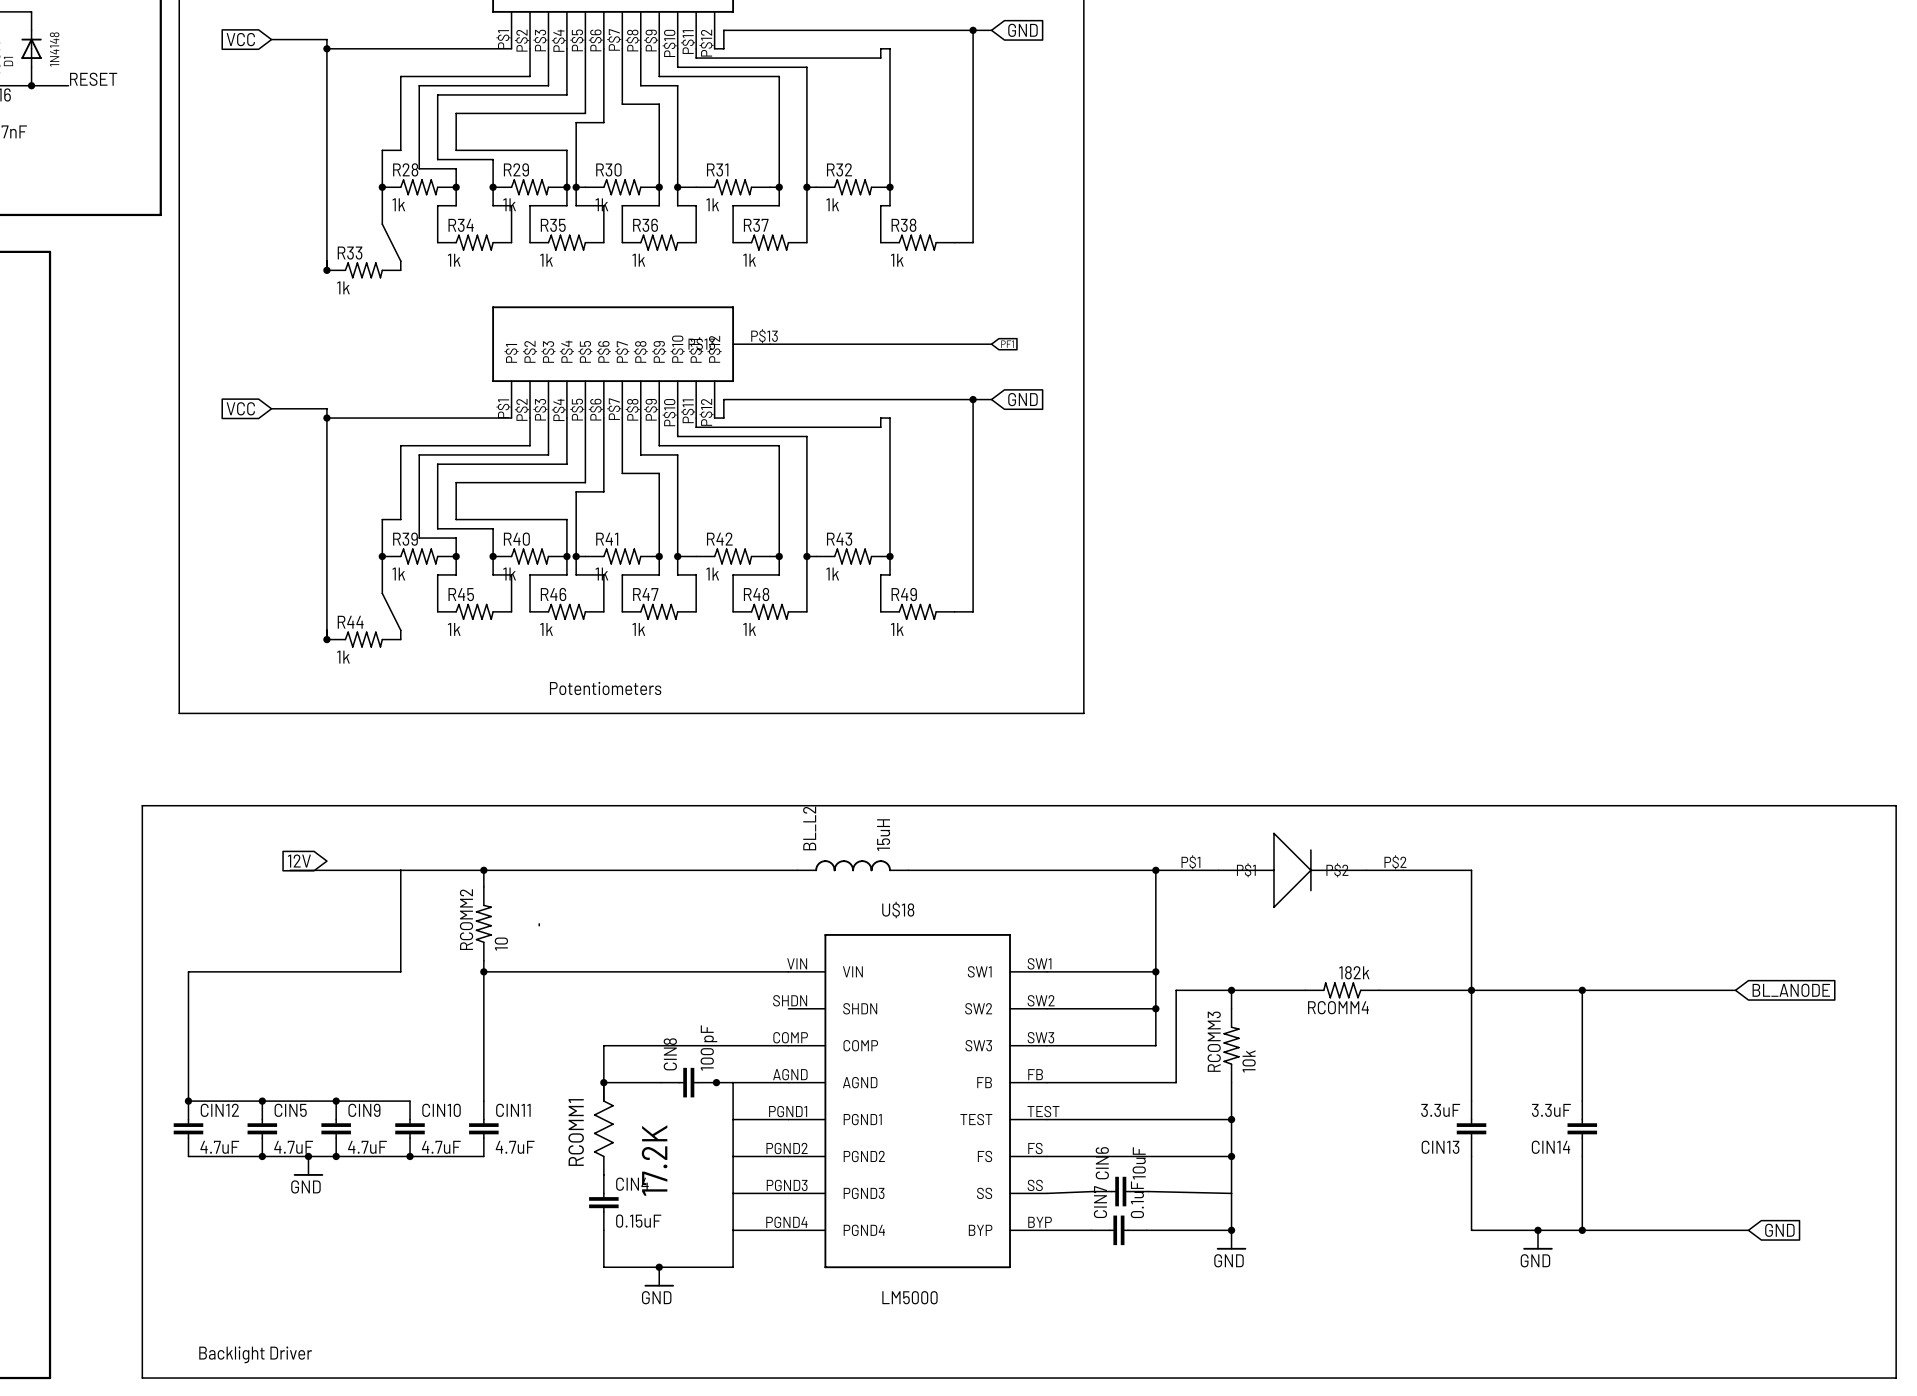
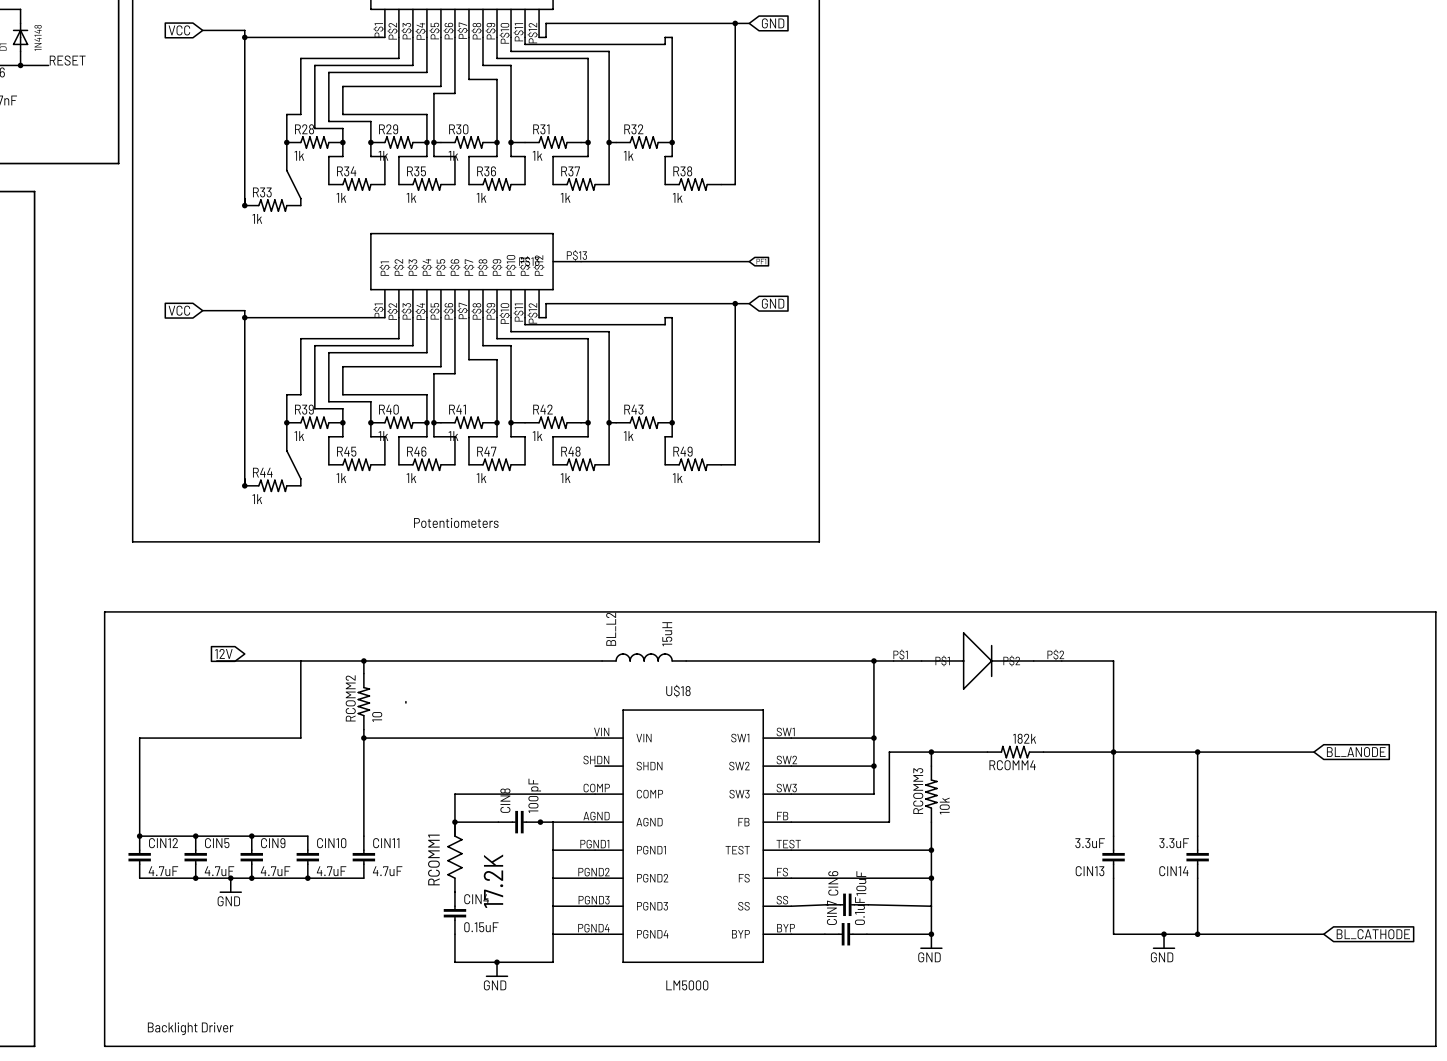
global label: GND (1779, 1230) -> BL_CATHODE (1373, 934)

